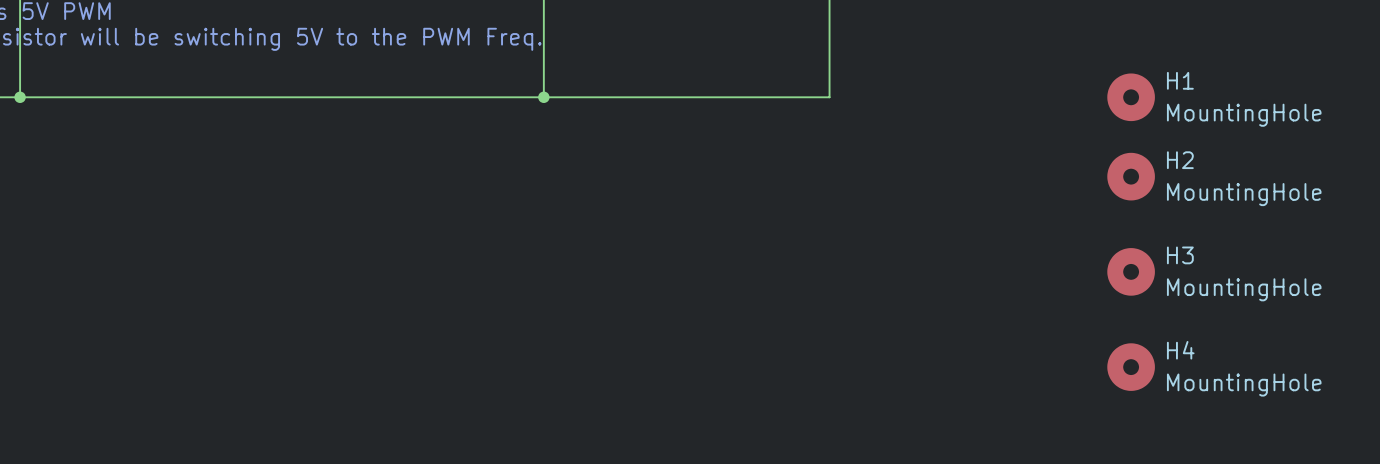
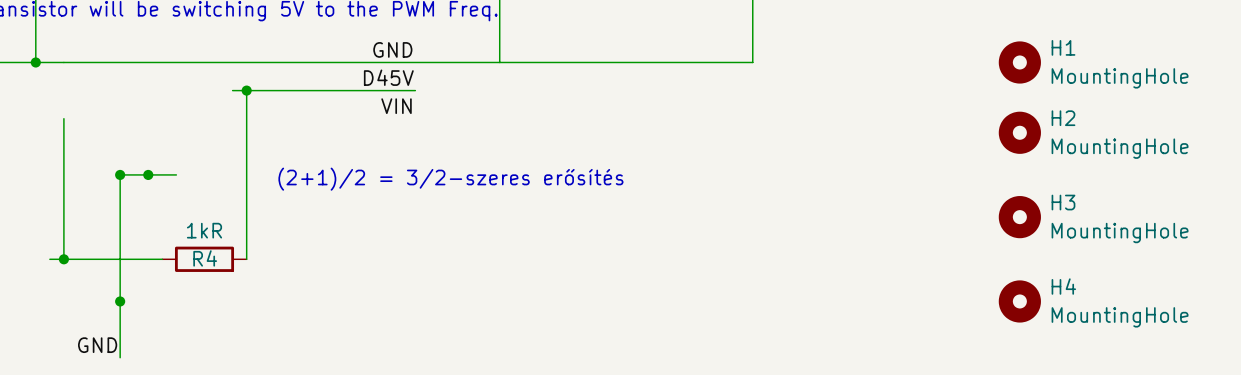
label: none -> GND (392, 49)
junction: (543, 97) -> none
label: none -> D45V (388, 77)
wire: none -> (232, 90) (415, 90)
wire: none -> (246, 90) (246, 259)
junction: none -> (246, 90)
label: none -> VIN (396, 106)
wire: none -> (63, 118) (63, 259)
junction: none -> (120, 174)
junction: none -> (148, 174)
wire: none -> (176, 174) (120, 174) (120, 357)
text: none -> (2+1)/2 = 3/2-szeres erősítés (450, 179)
wire: none -> (49, 259) (162, 259)
junction: none -> (63, 259)
R4: none -> 1kR (204, 259)
junction: none -> (120, 301)
label: none -> GND (97, 345)

